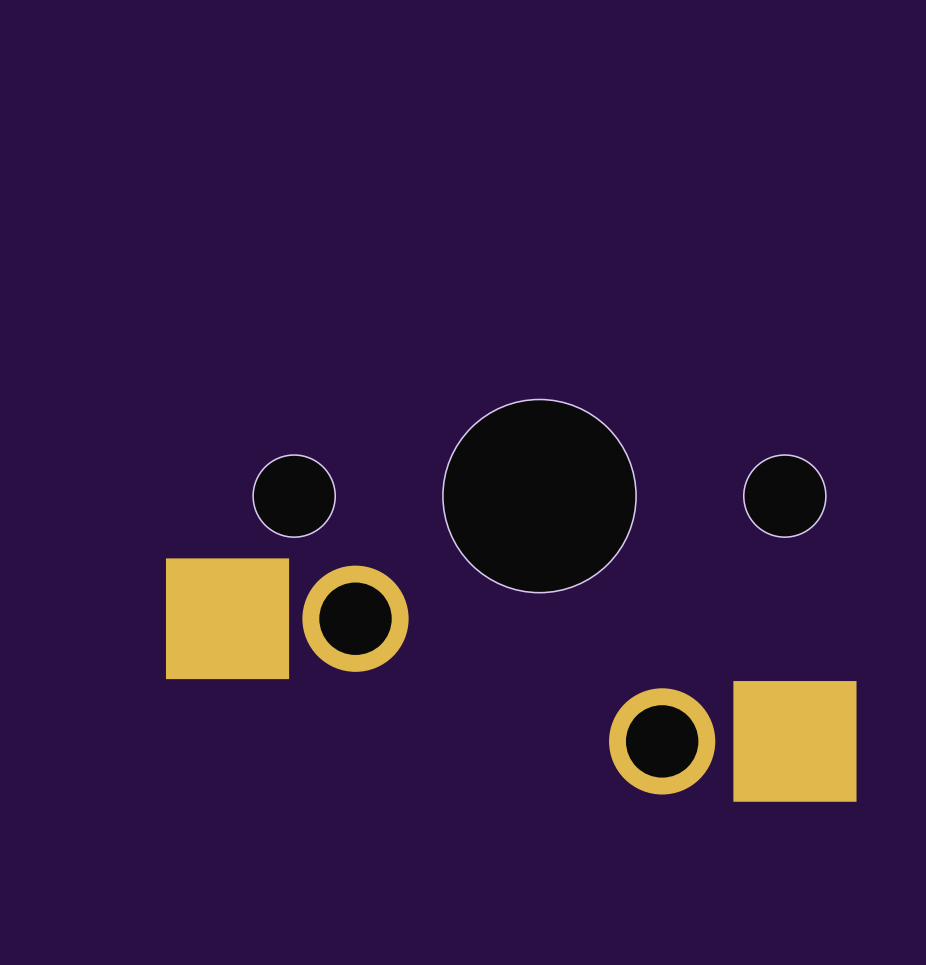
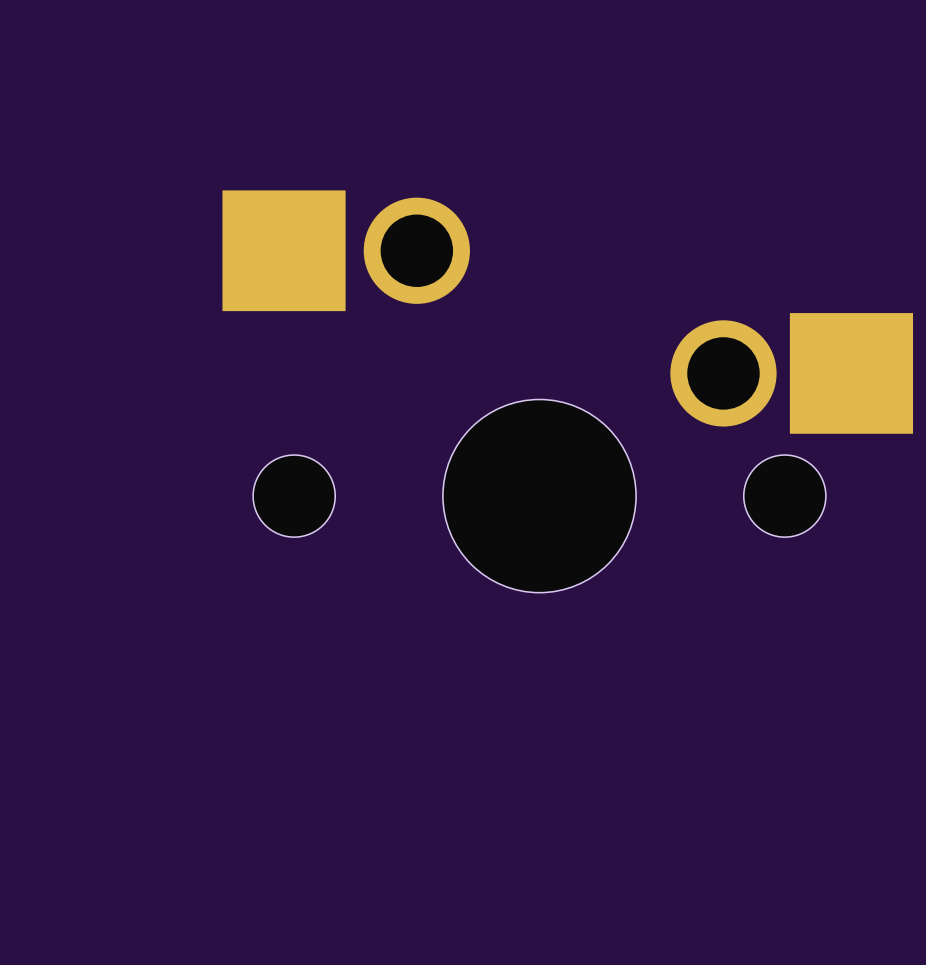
part rotation: 0° (511, 600) -> 180° (567, 391)

